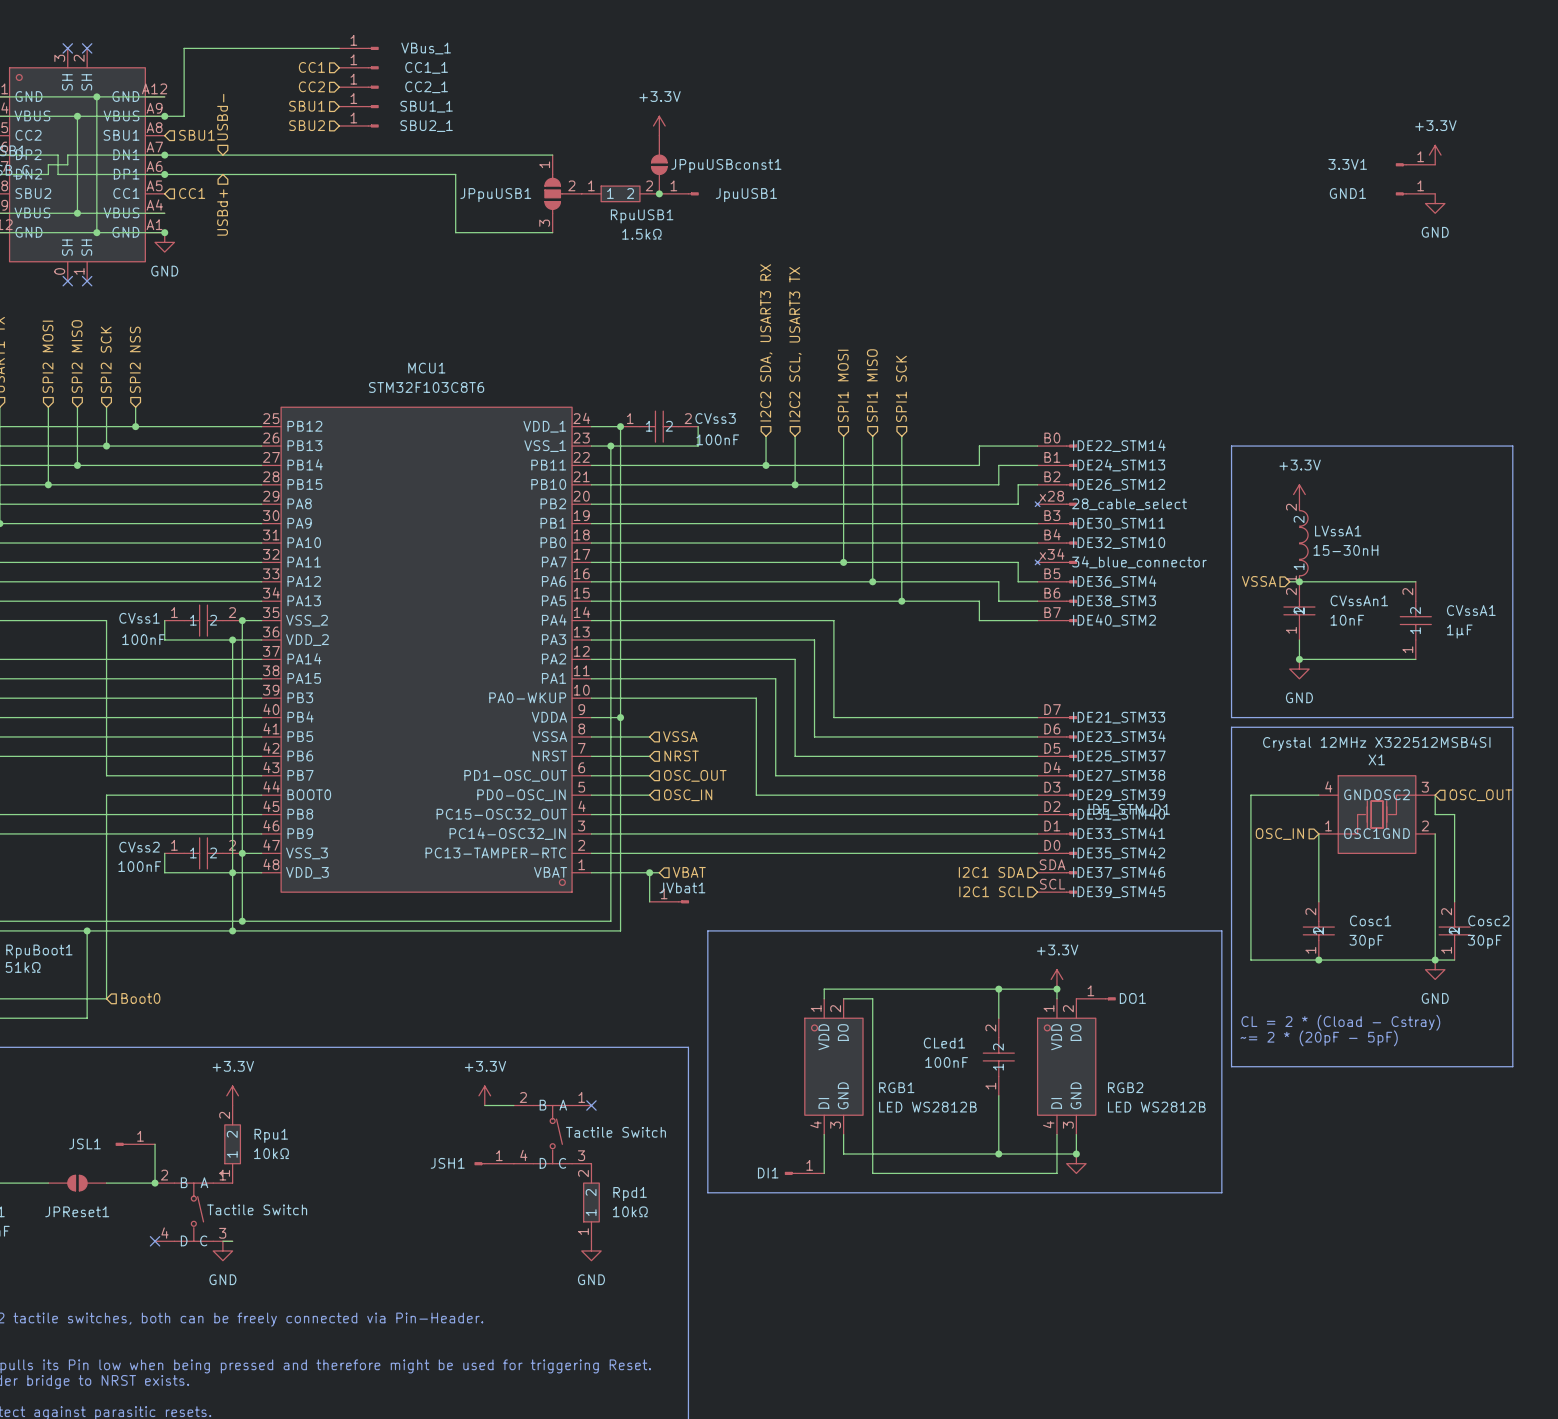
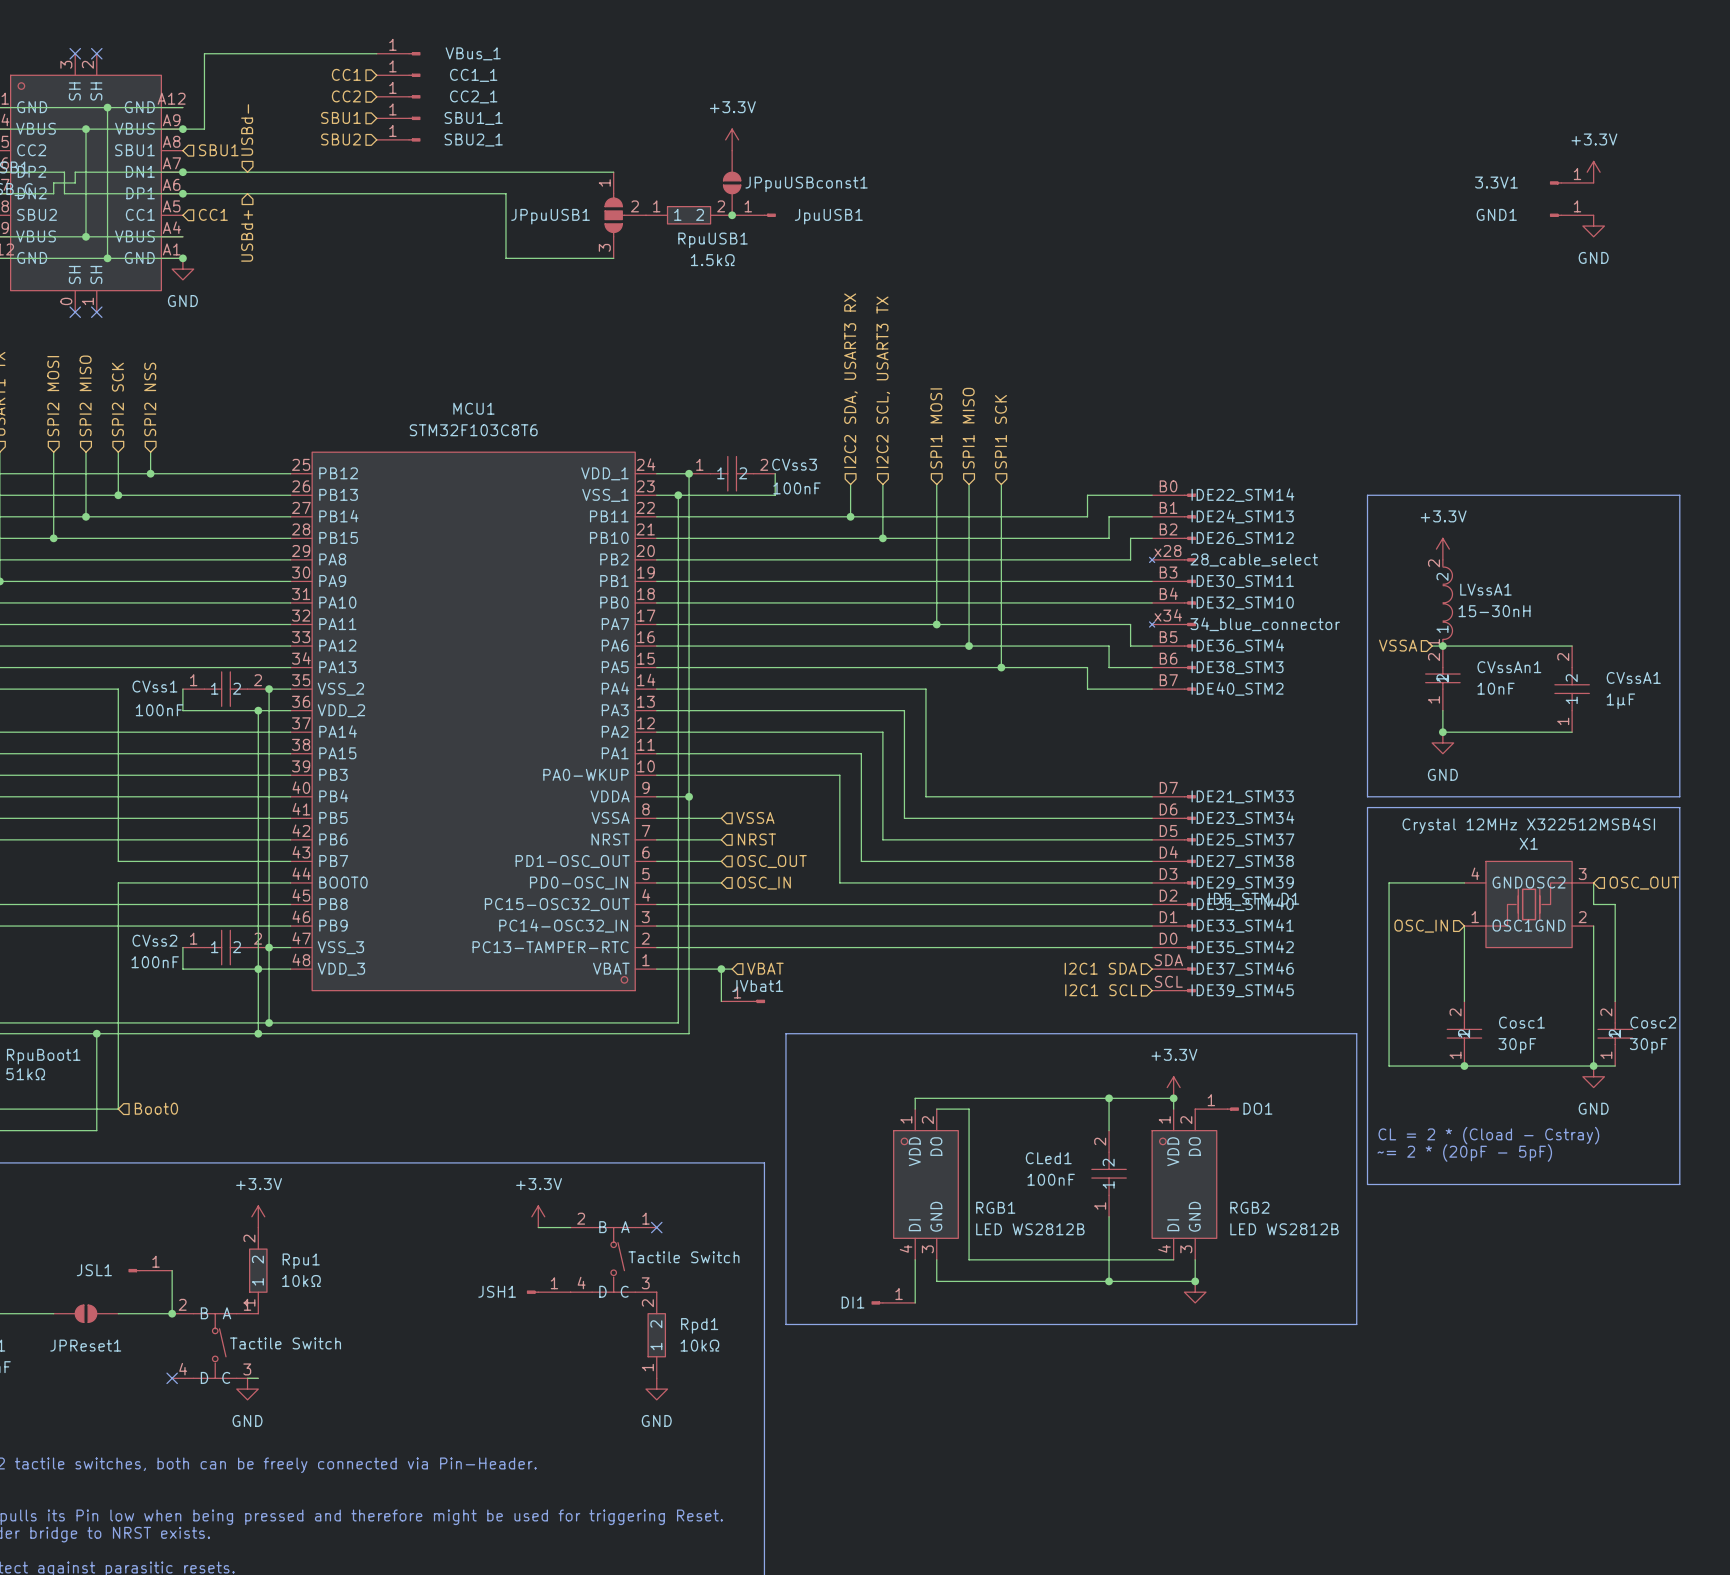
wire: (872, 1134) (872, 1173) (1056, 1173) (1056, 1134) -> (969, 1259) (1173, 1259)

